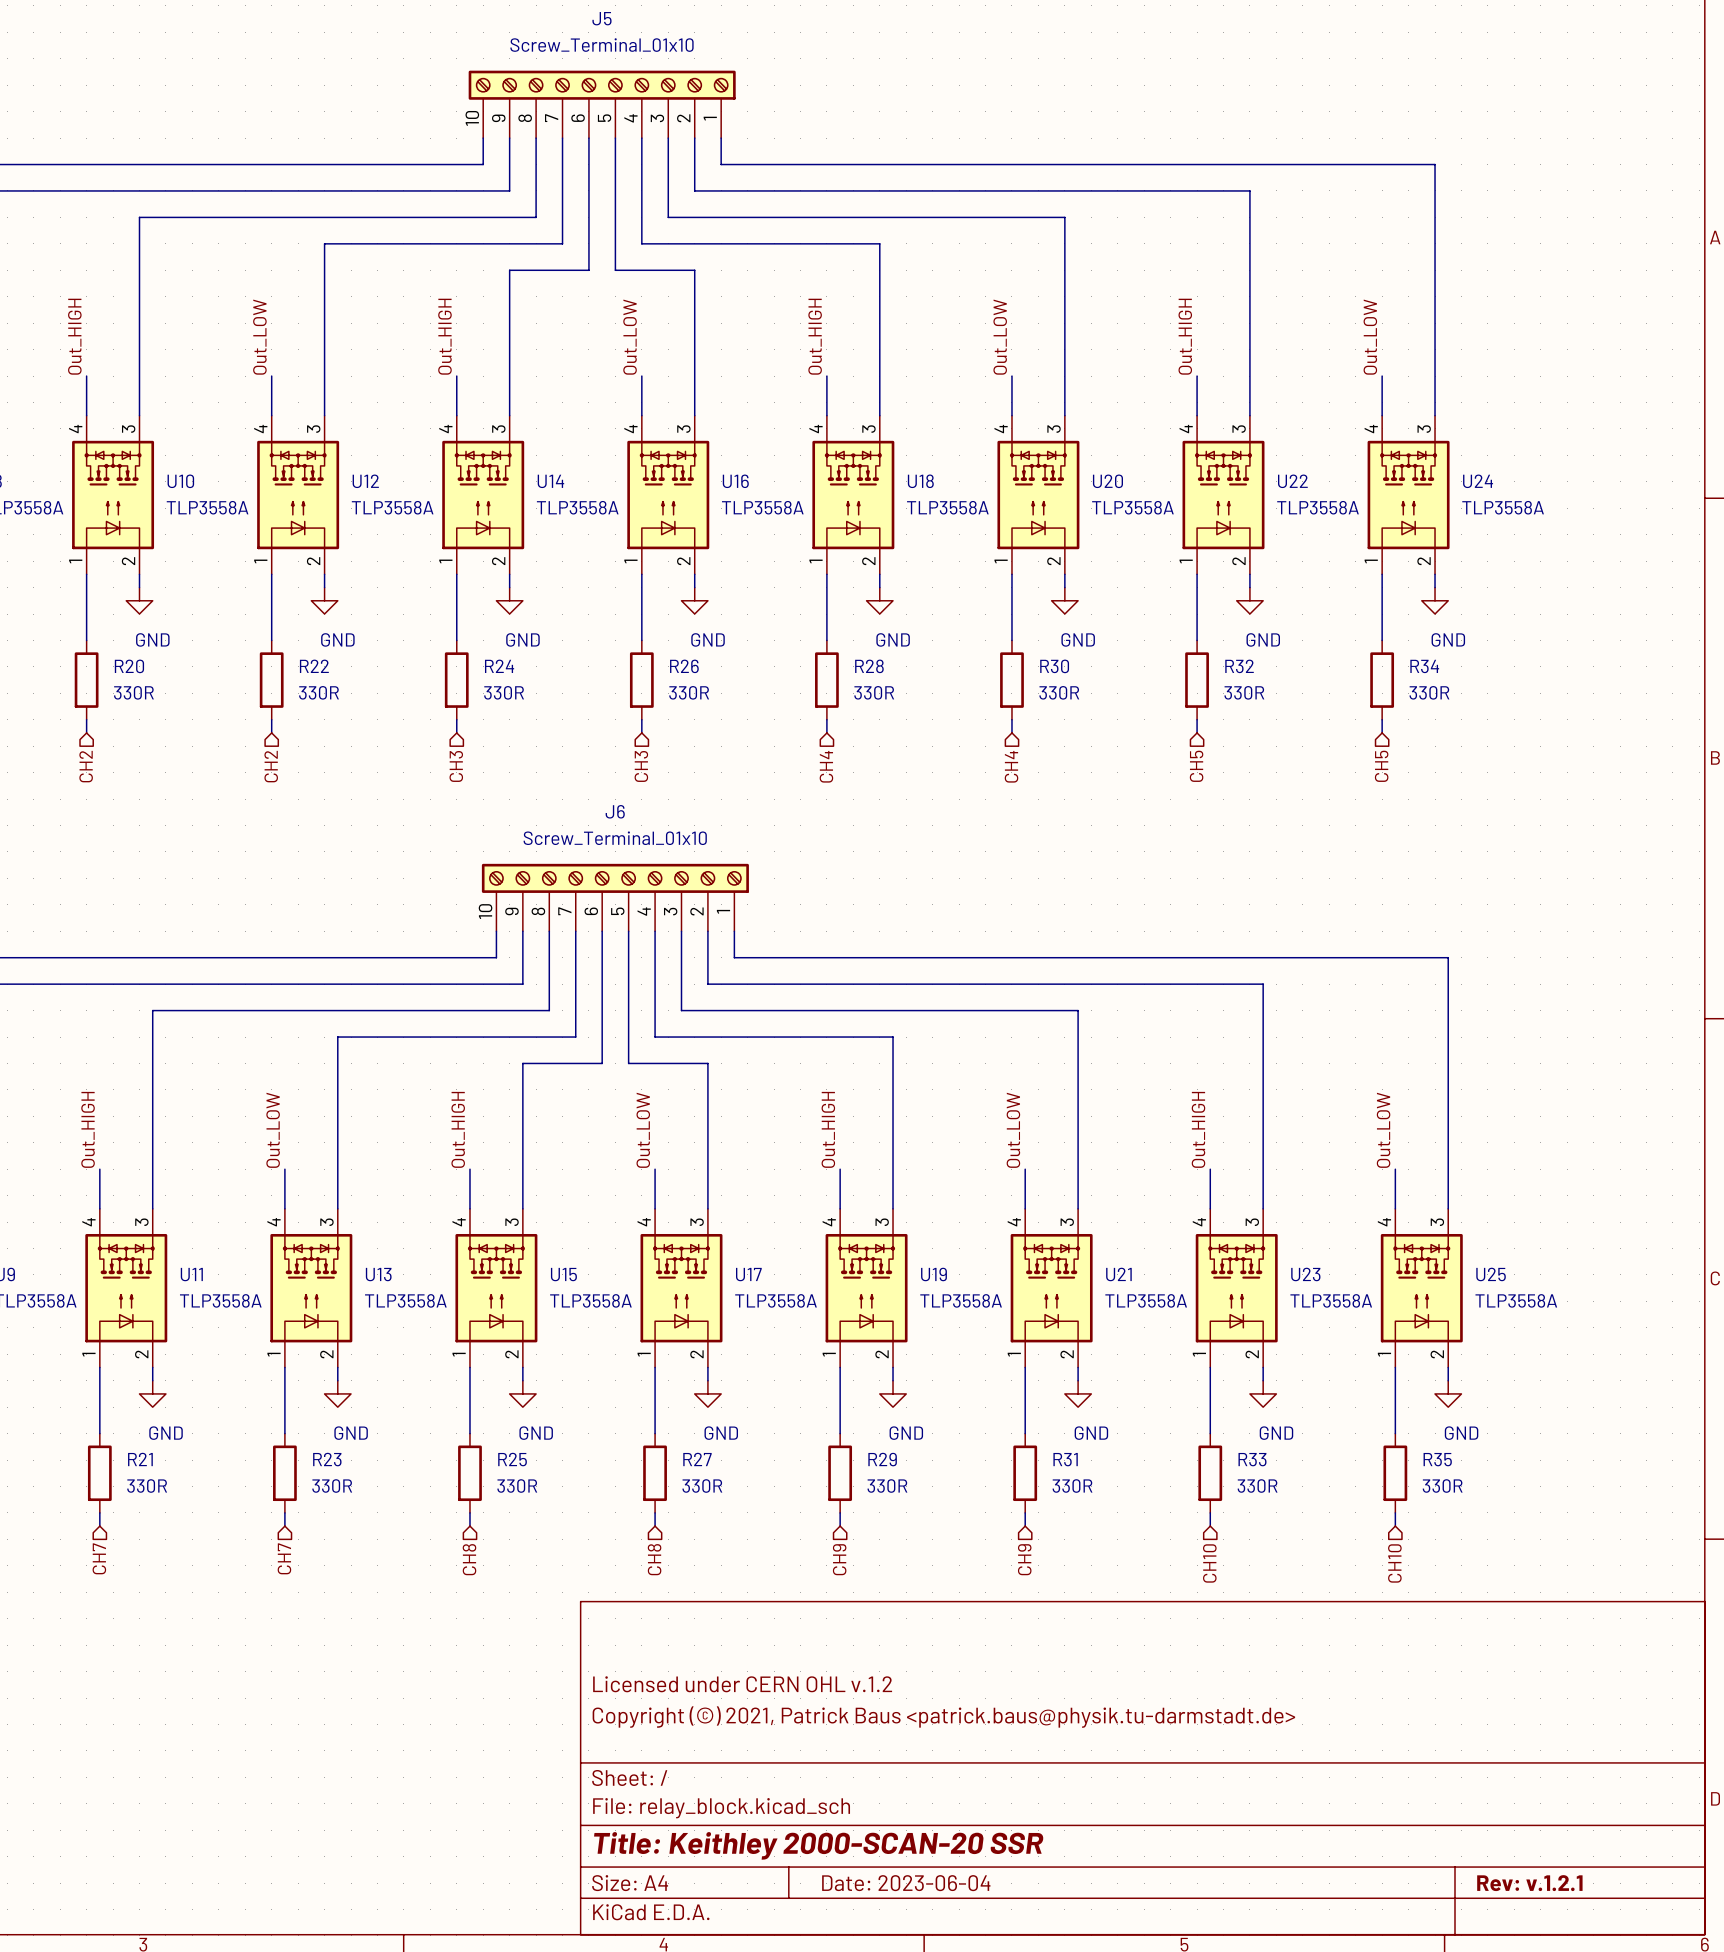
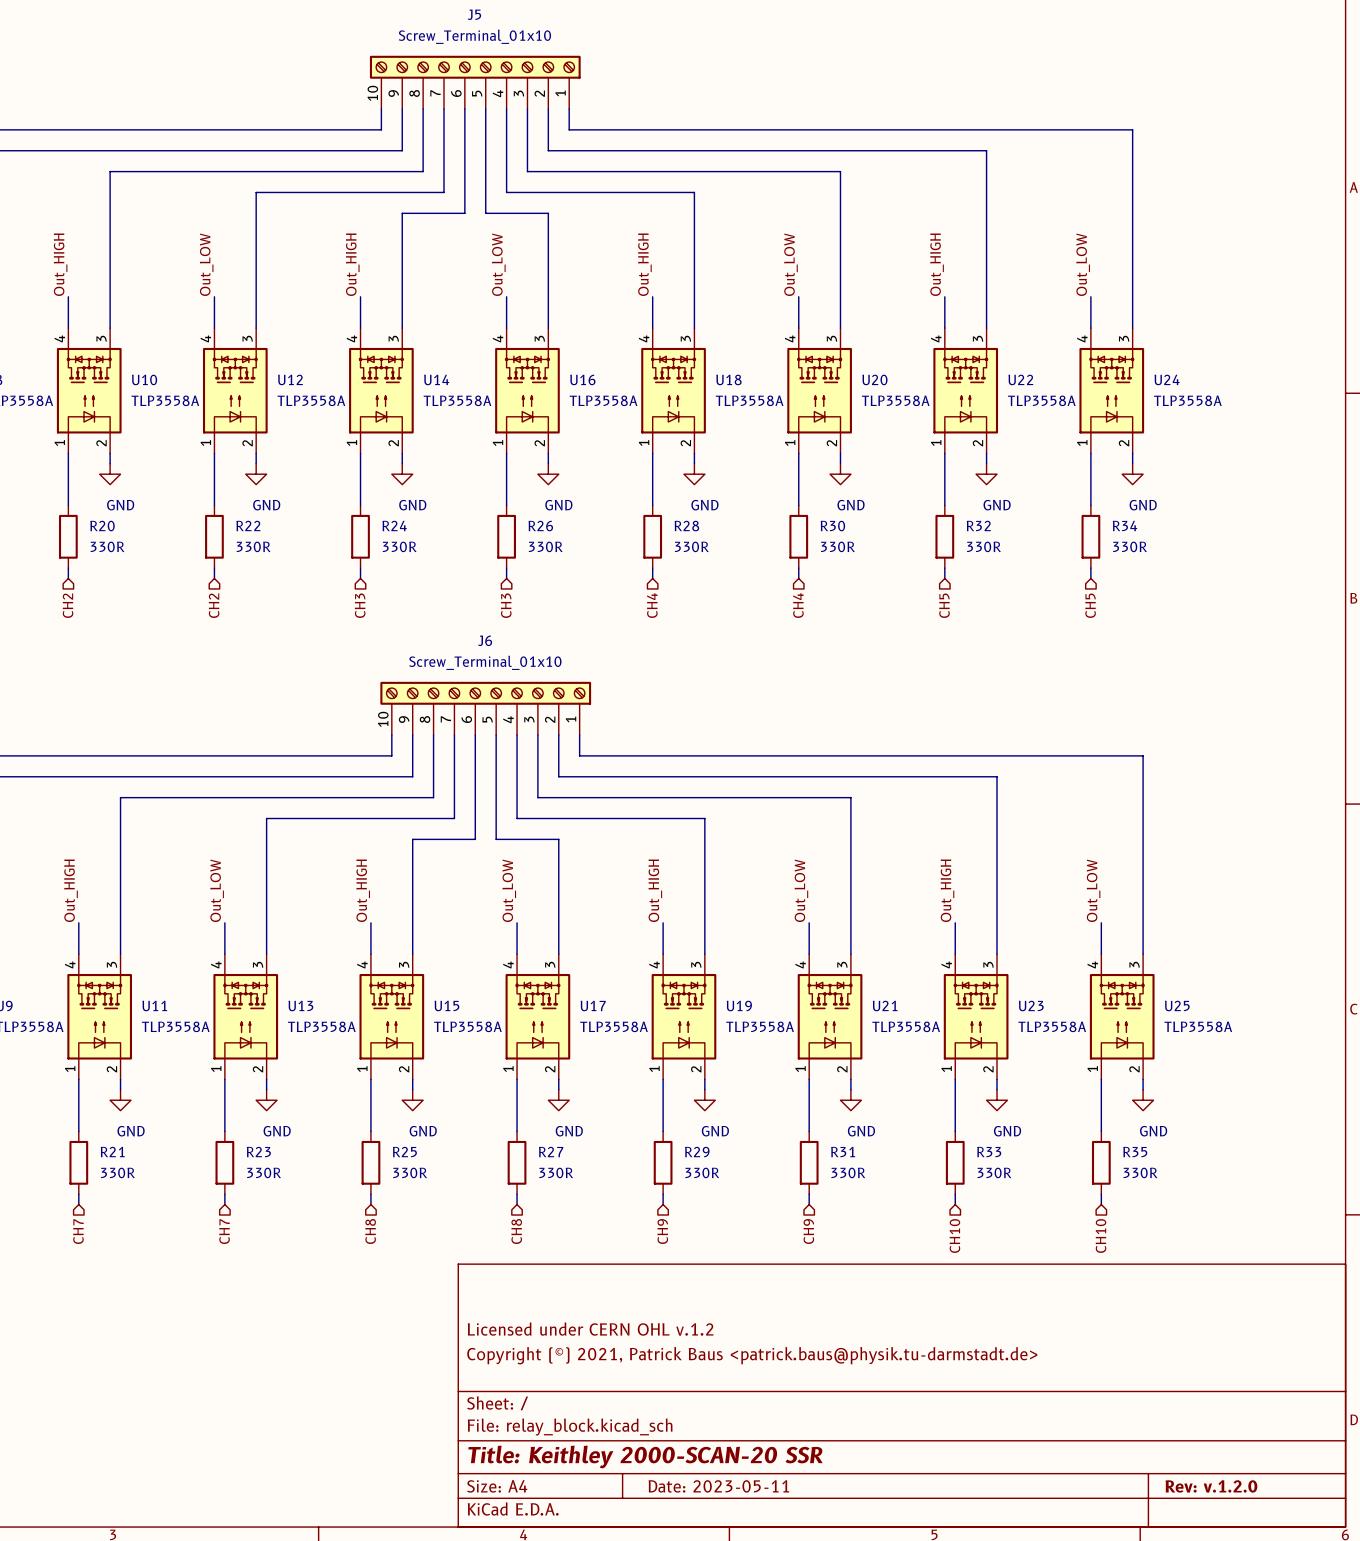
title block: Date: 2023-06-04 (906, 1883) -> Date: 2023-05-11 (718, 1486)
title block: Rev: v.1.2.1 (1529, 1883) -> Rev: v.1.2.0 (1211, 1486)

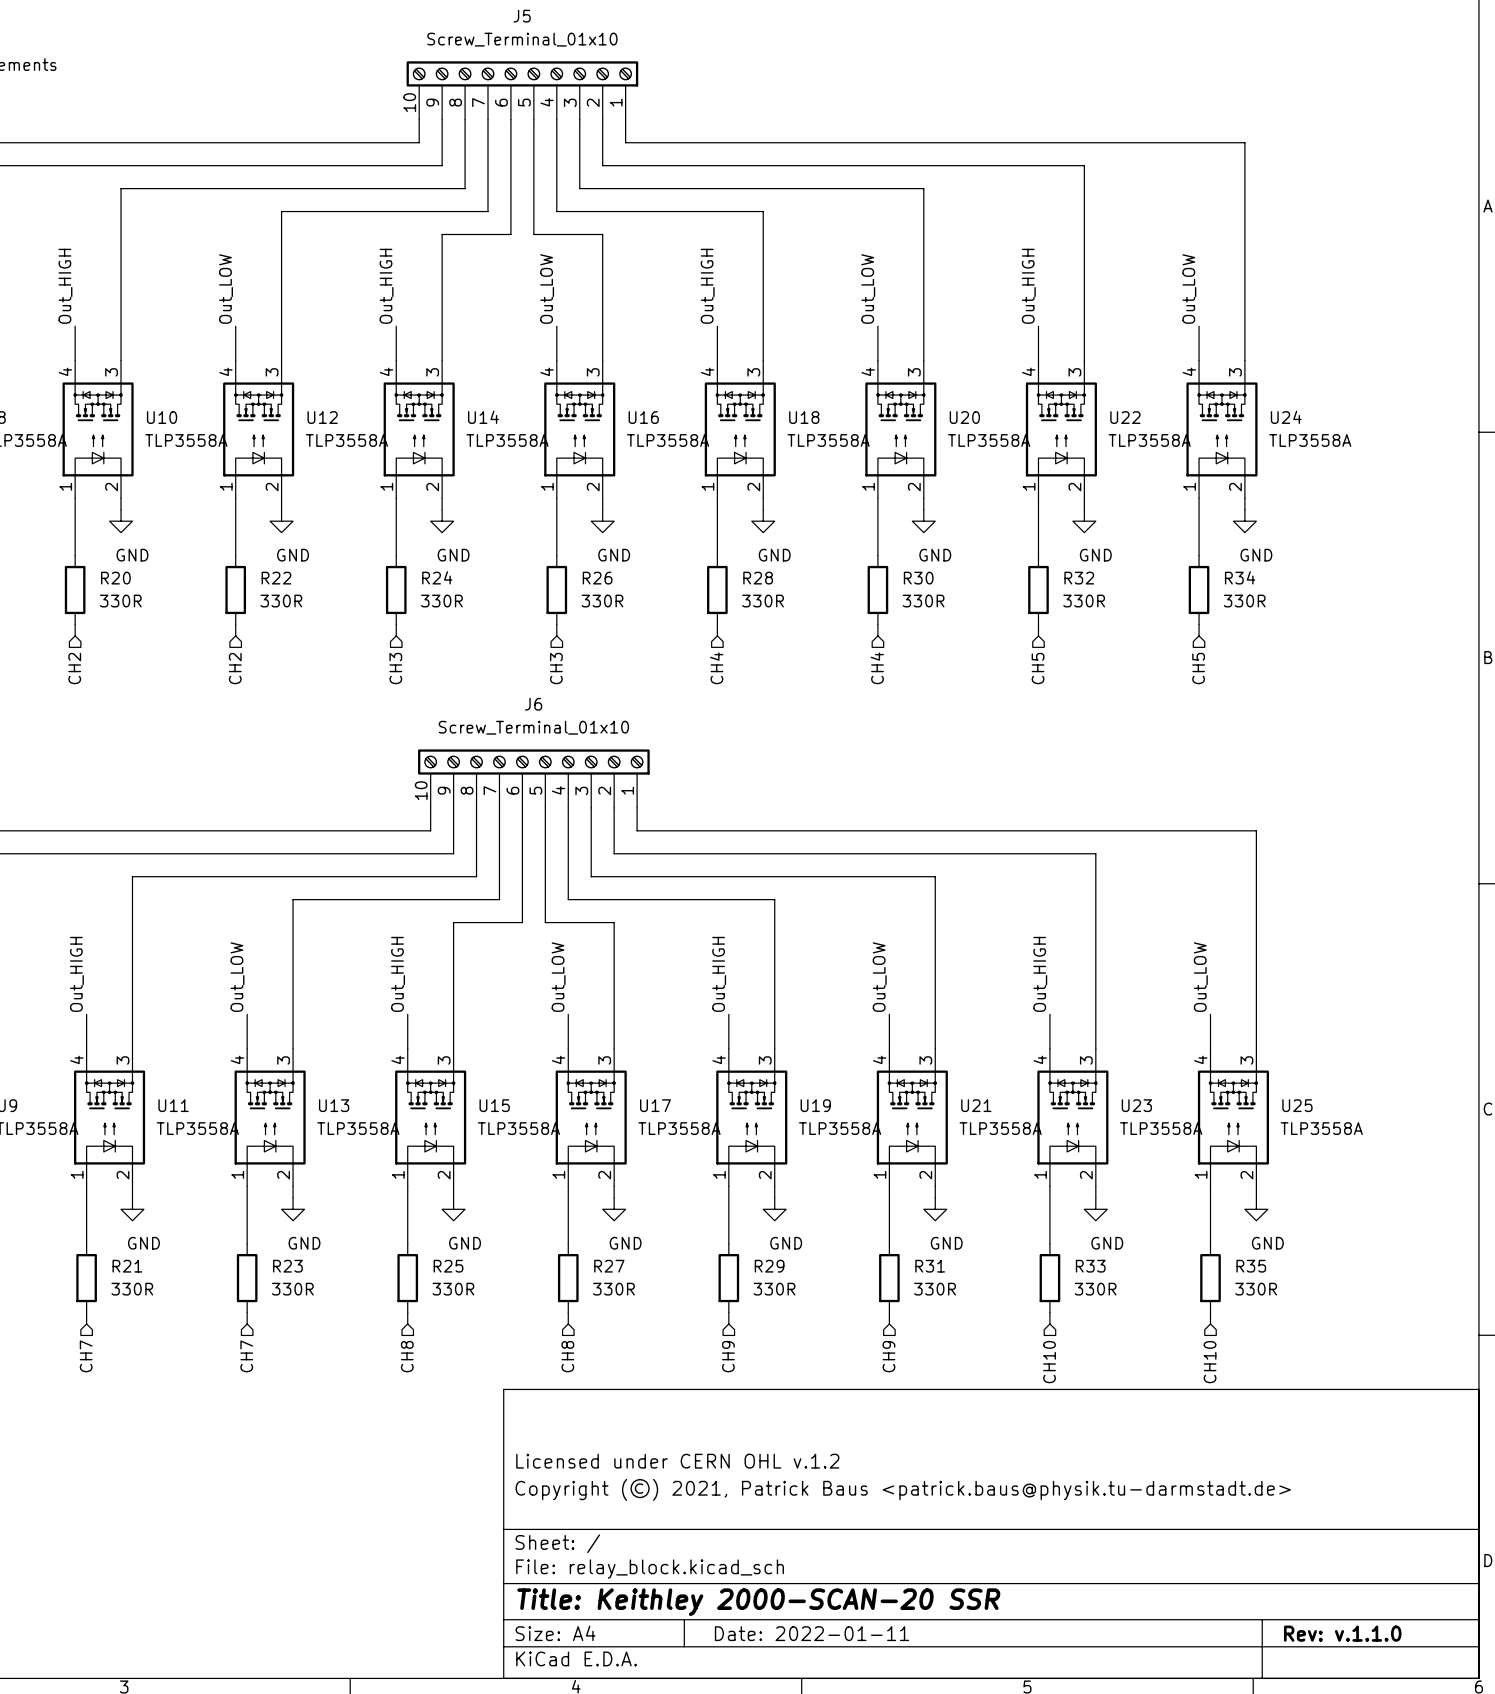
title block: Date: 2023-05-11 (718, 1486) -> Date: 2022-01-11 (811, 1633)
title block: Rev: v.1.2.0 (1211, 1486) -> Rev: v.1.1.0 (1342, 1633)

